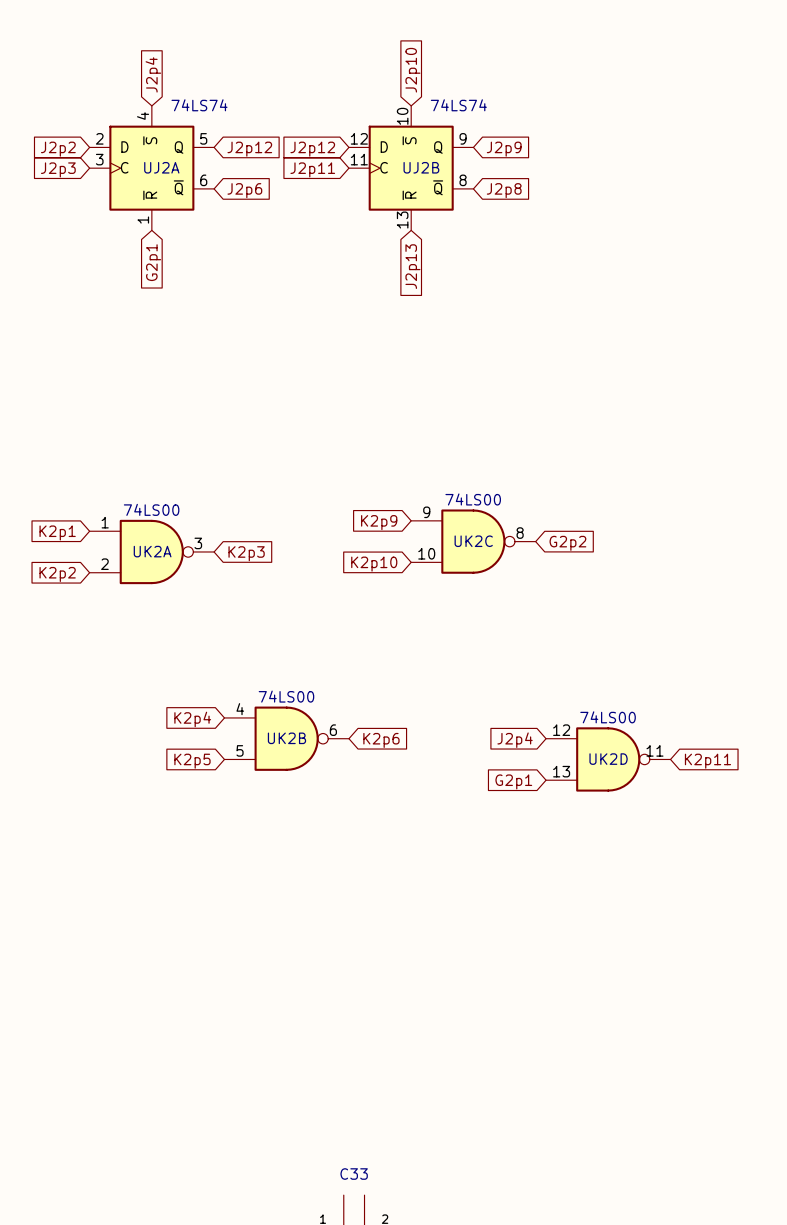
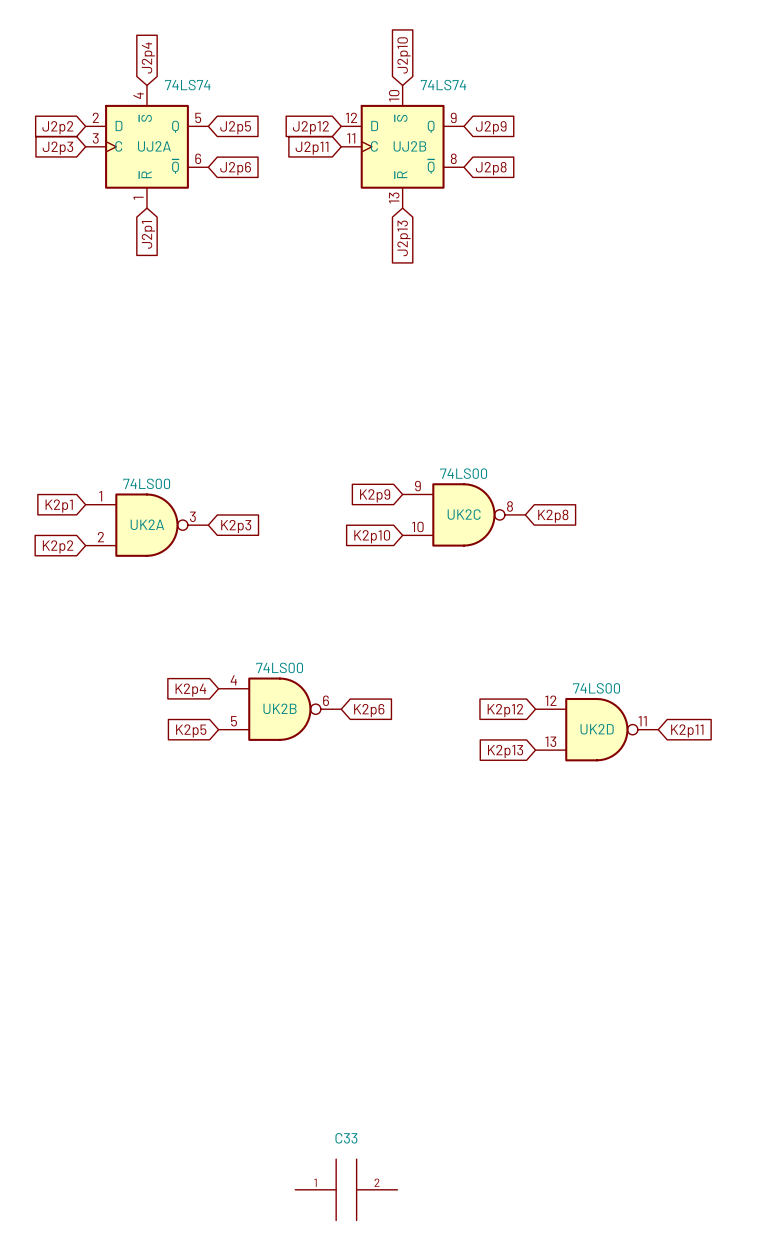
global label: J2p12 (249, 149) -> J2p5 (235, 127)
global label: G2p1 (153, 262) -> J2p1 (148, 234)
global label: G2p2 (567, 543) -> K2p8 (553, 516)
global label: J2p4 (515, 740) -> K2p12 (505, 710)
global label: G2p1 (513, 781) -> K2p13 (505, 751)

